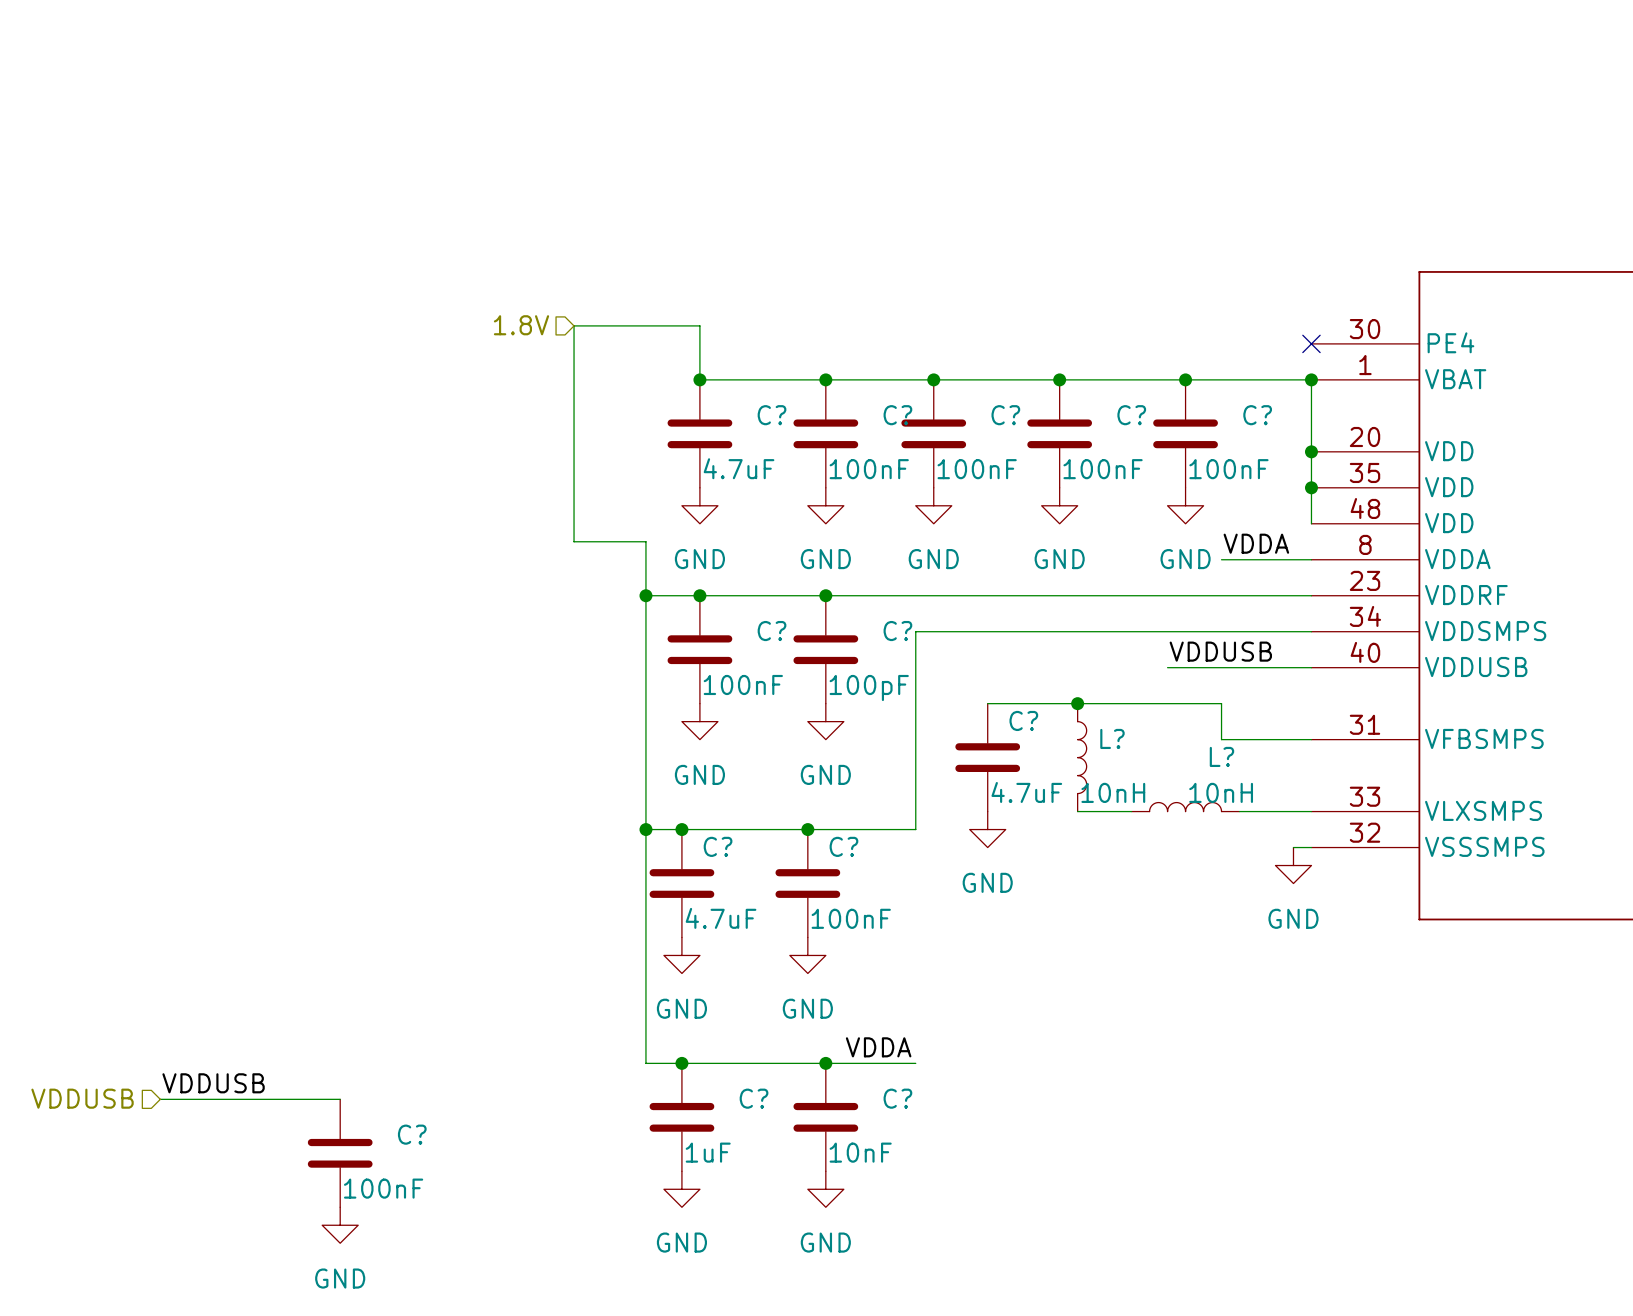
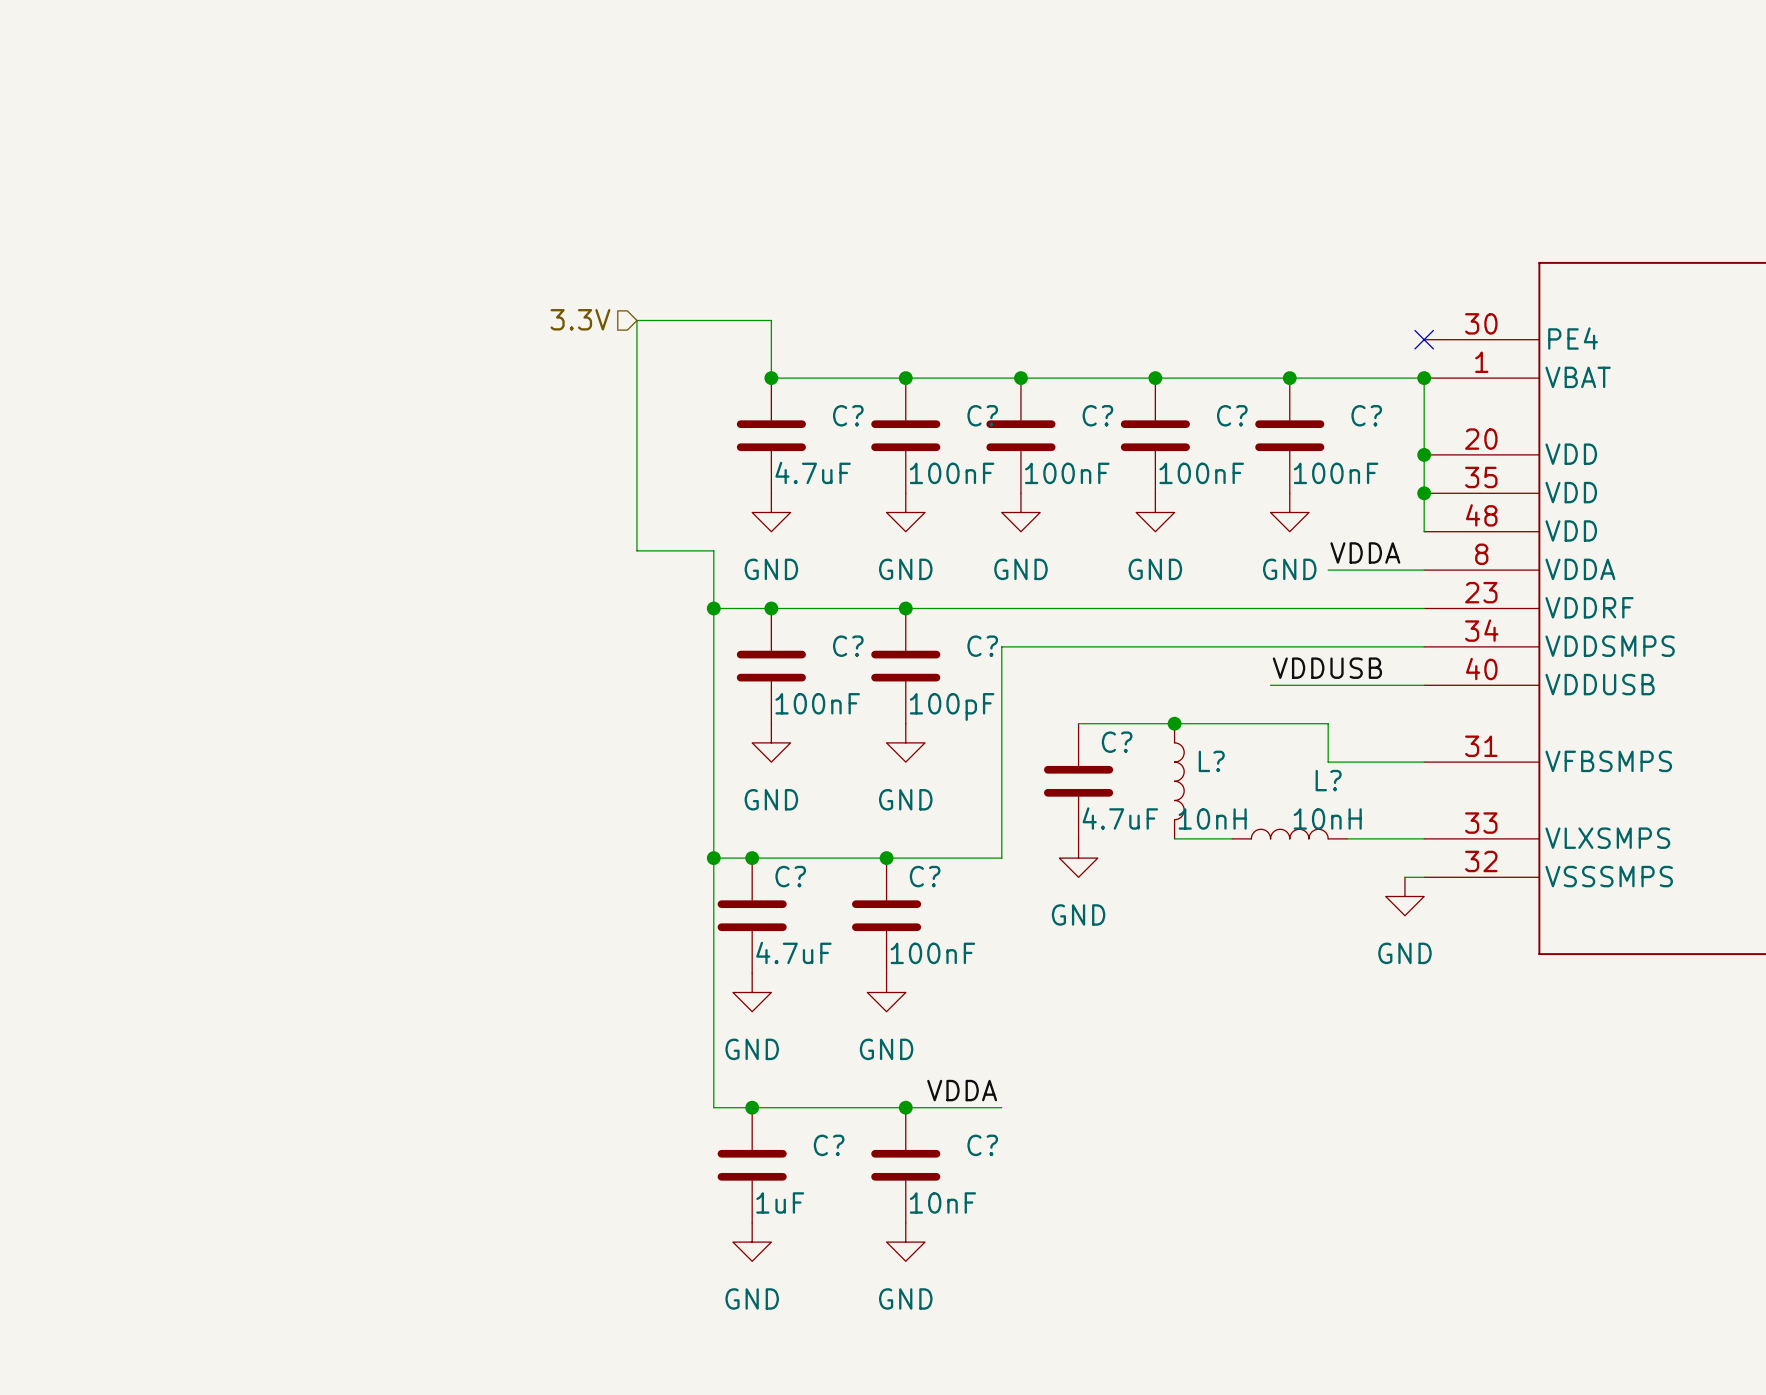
hierarchical label: 1.8V (521, 325) -> 3.3V (580, 319)
label: VDDUSB (213, 1083) -> none
hierarchical label: VDDUSB (82, 1098) -> none
wire: (160, 1099) (340, 1099) -> none
C?: 100nF (340, 1153) -> none
power symbol: GND (340, 1225) -> none

